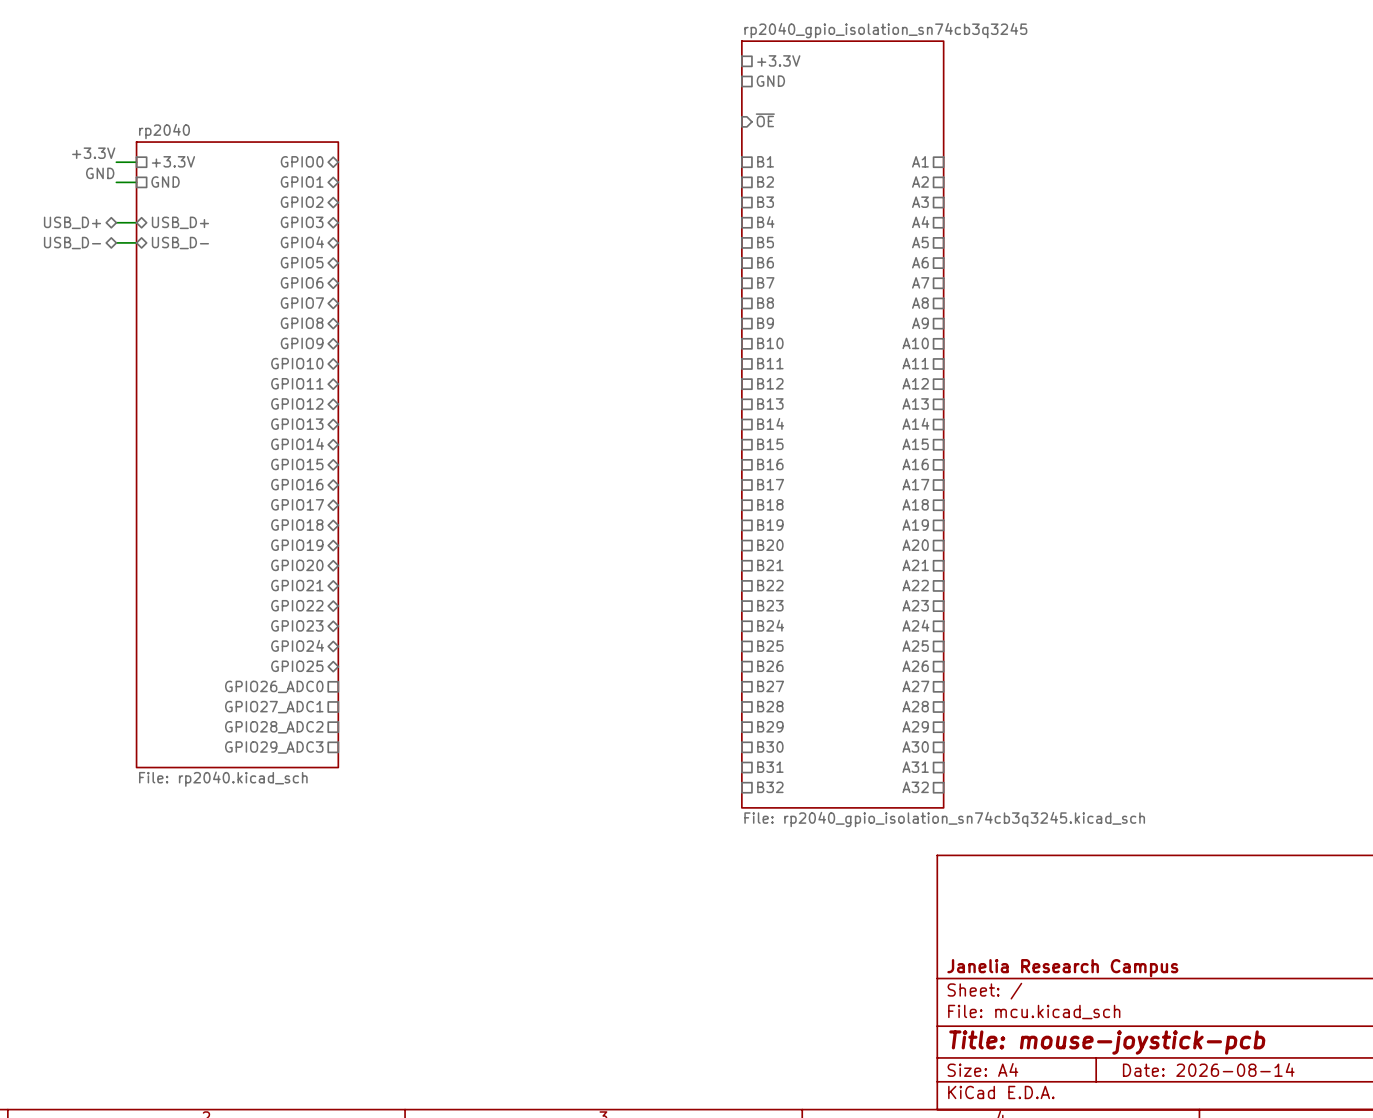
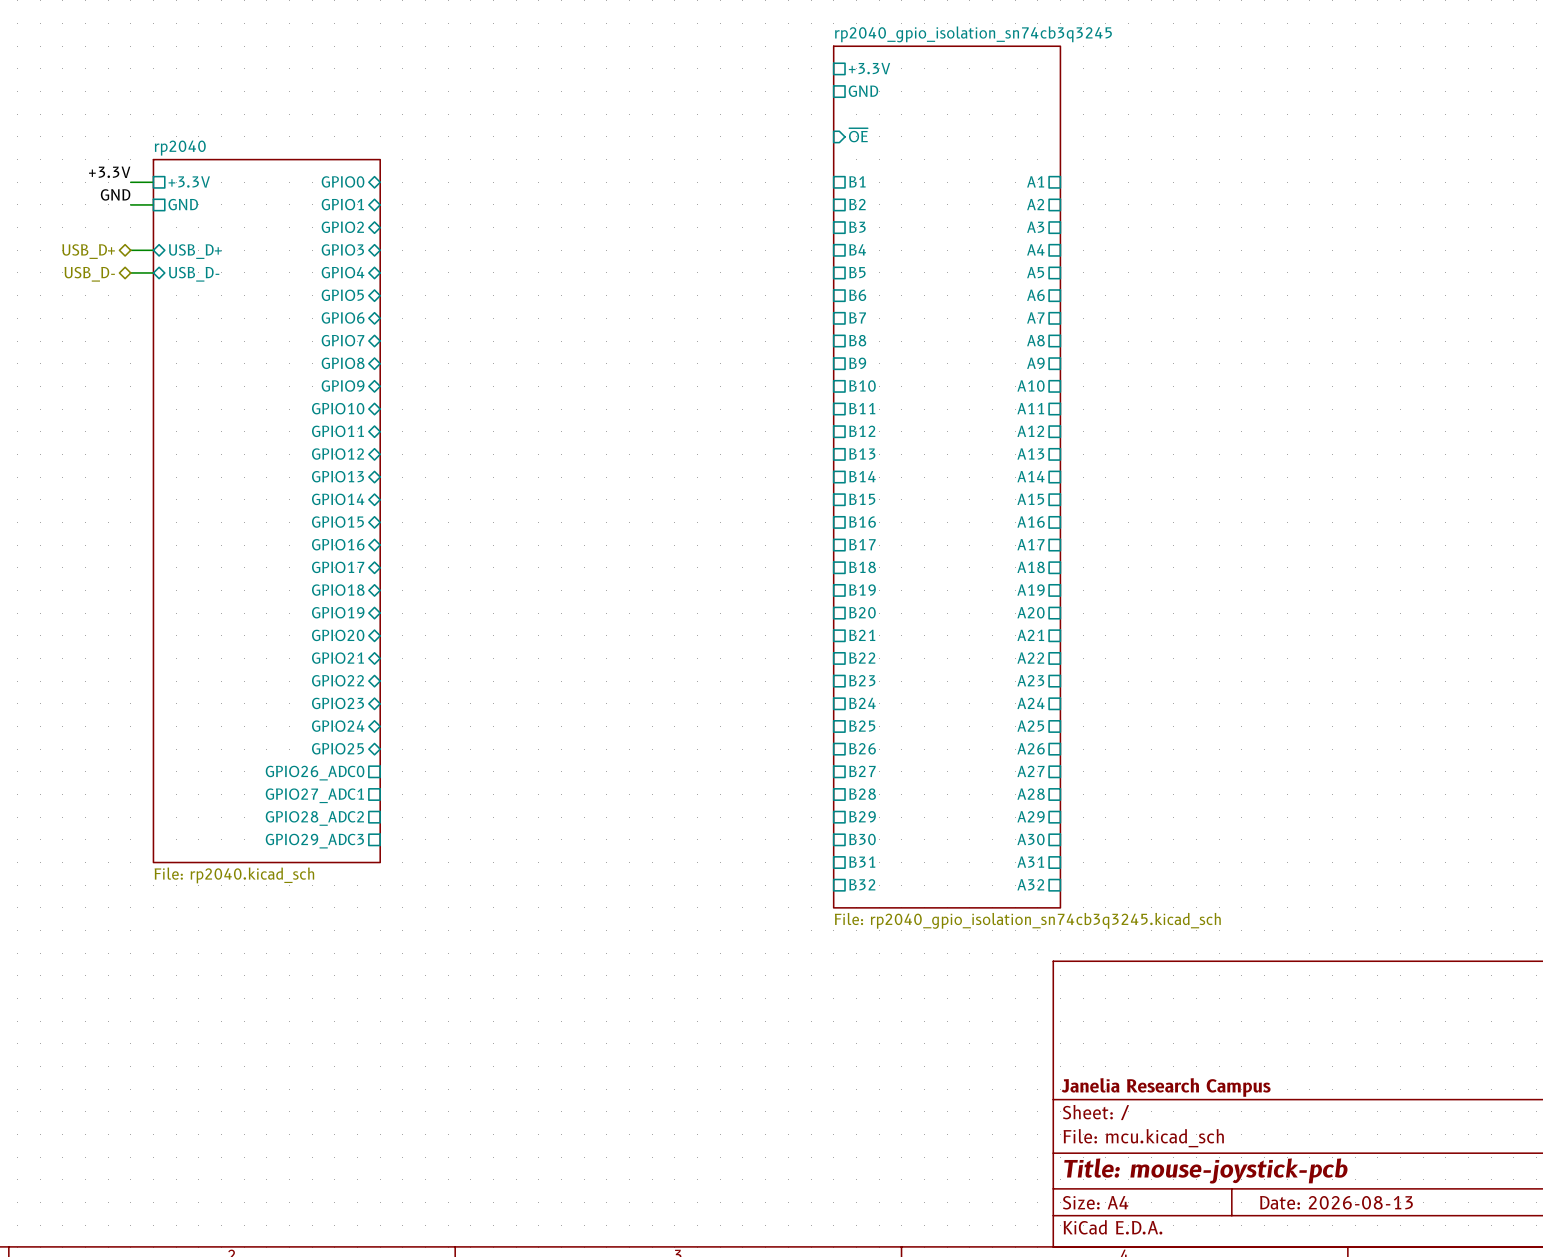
title block: Date: 2026-08-14 (1208, 1069) -> Date: 2026-08-13 (1336, 1202)

